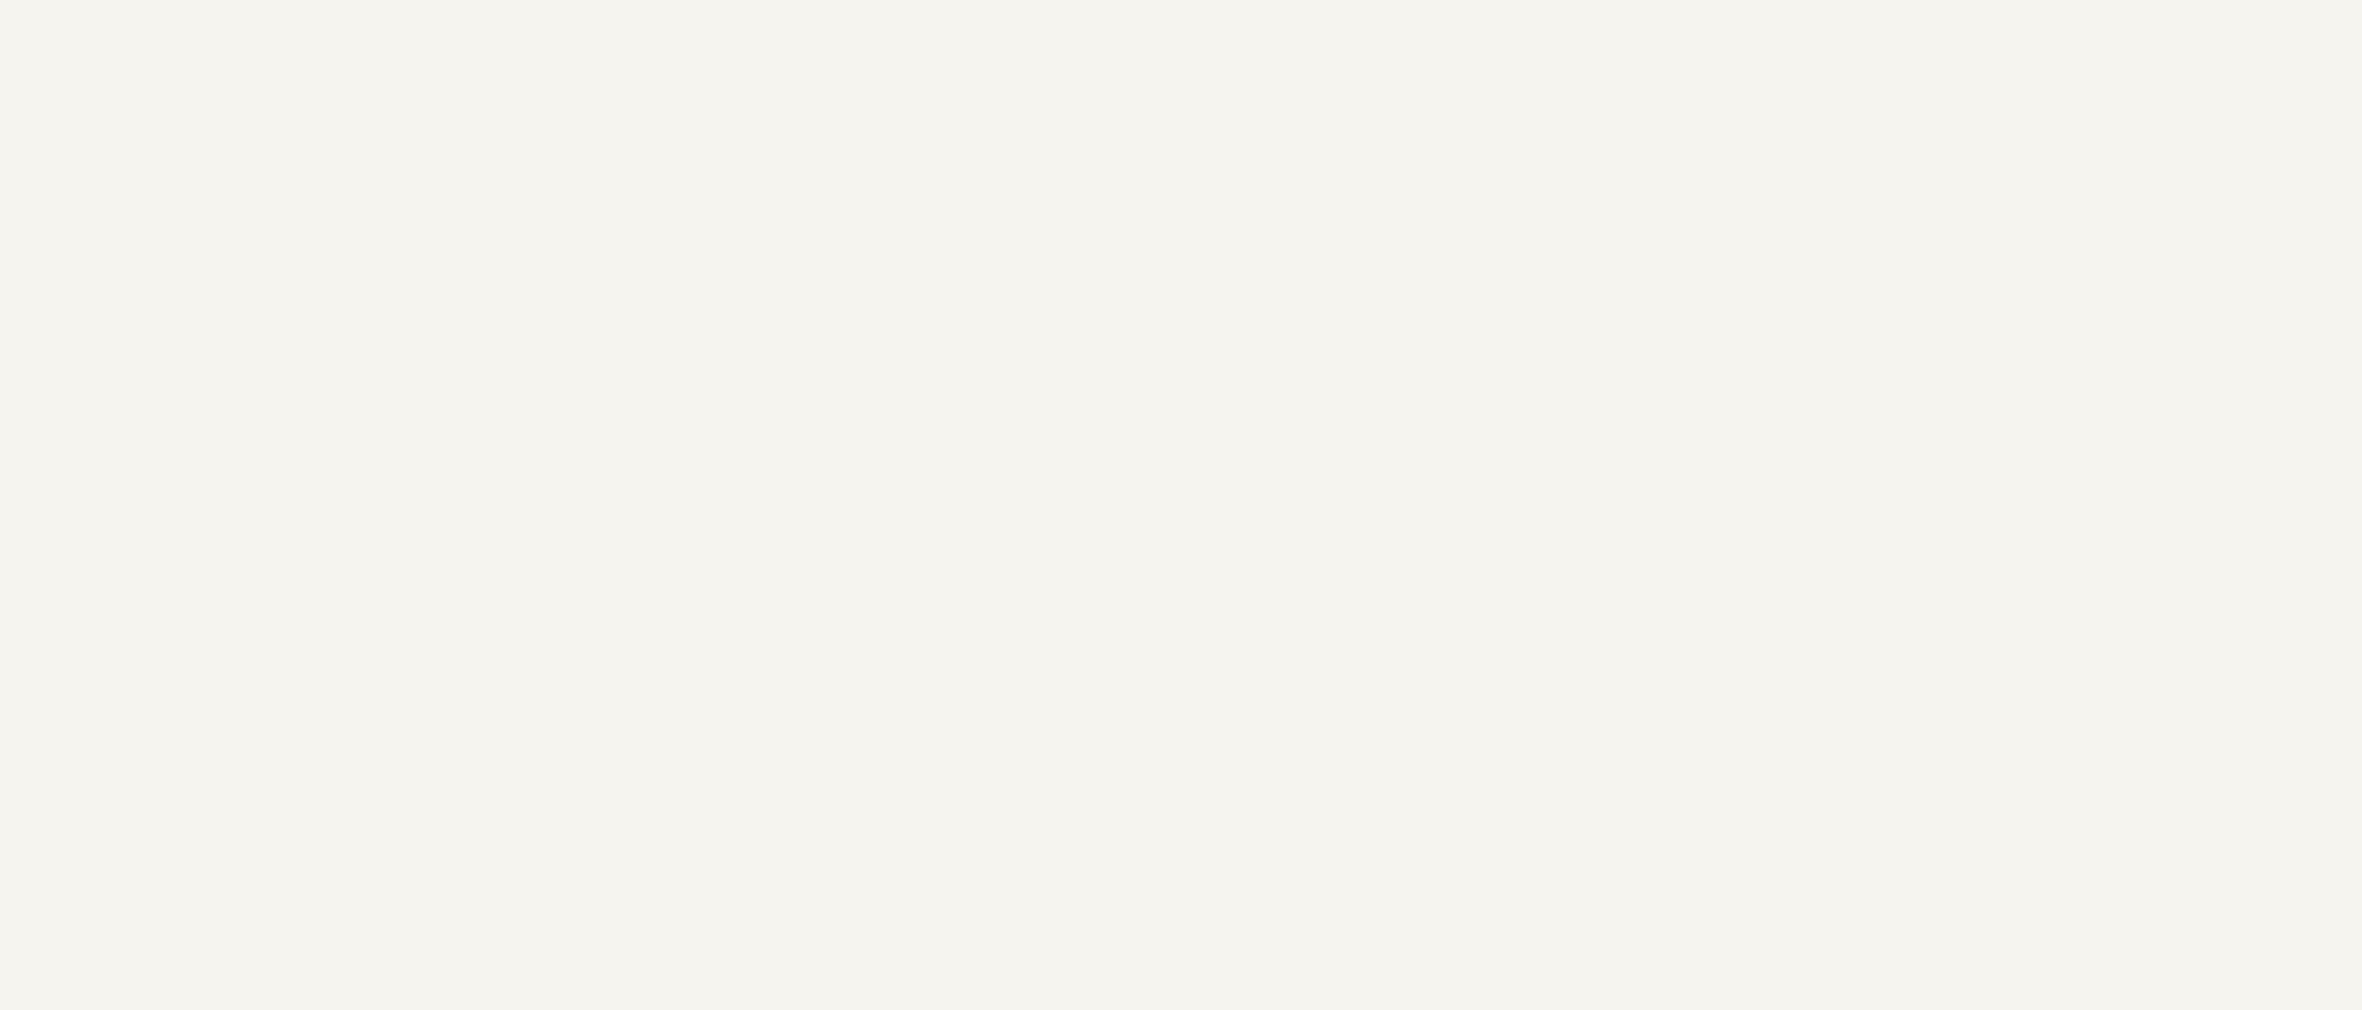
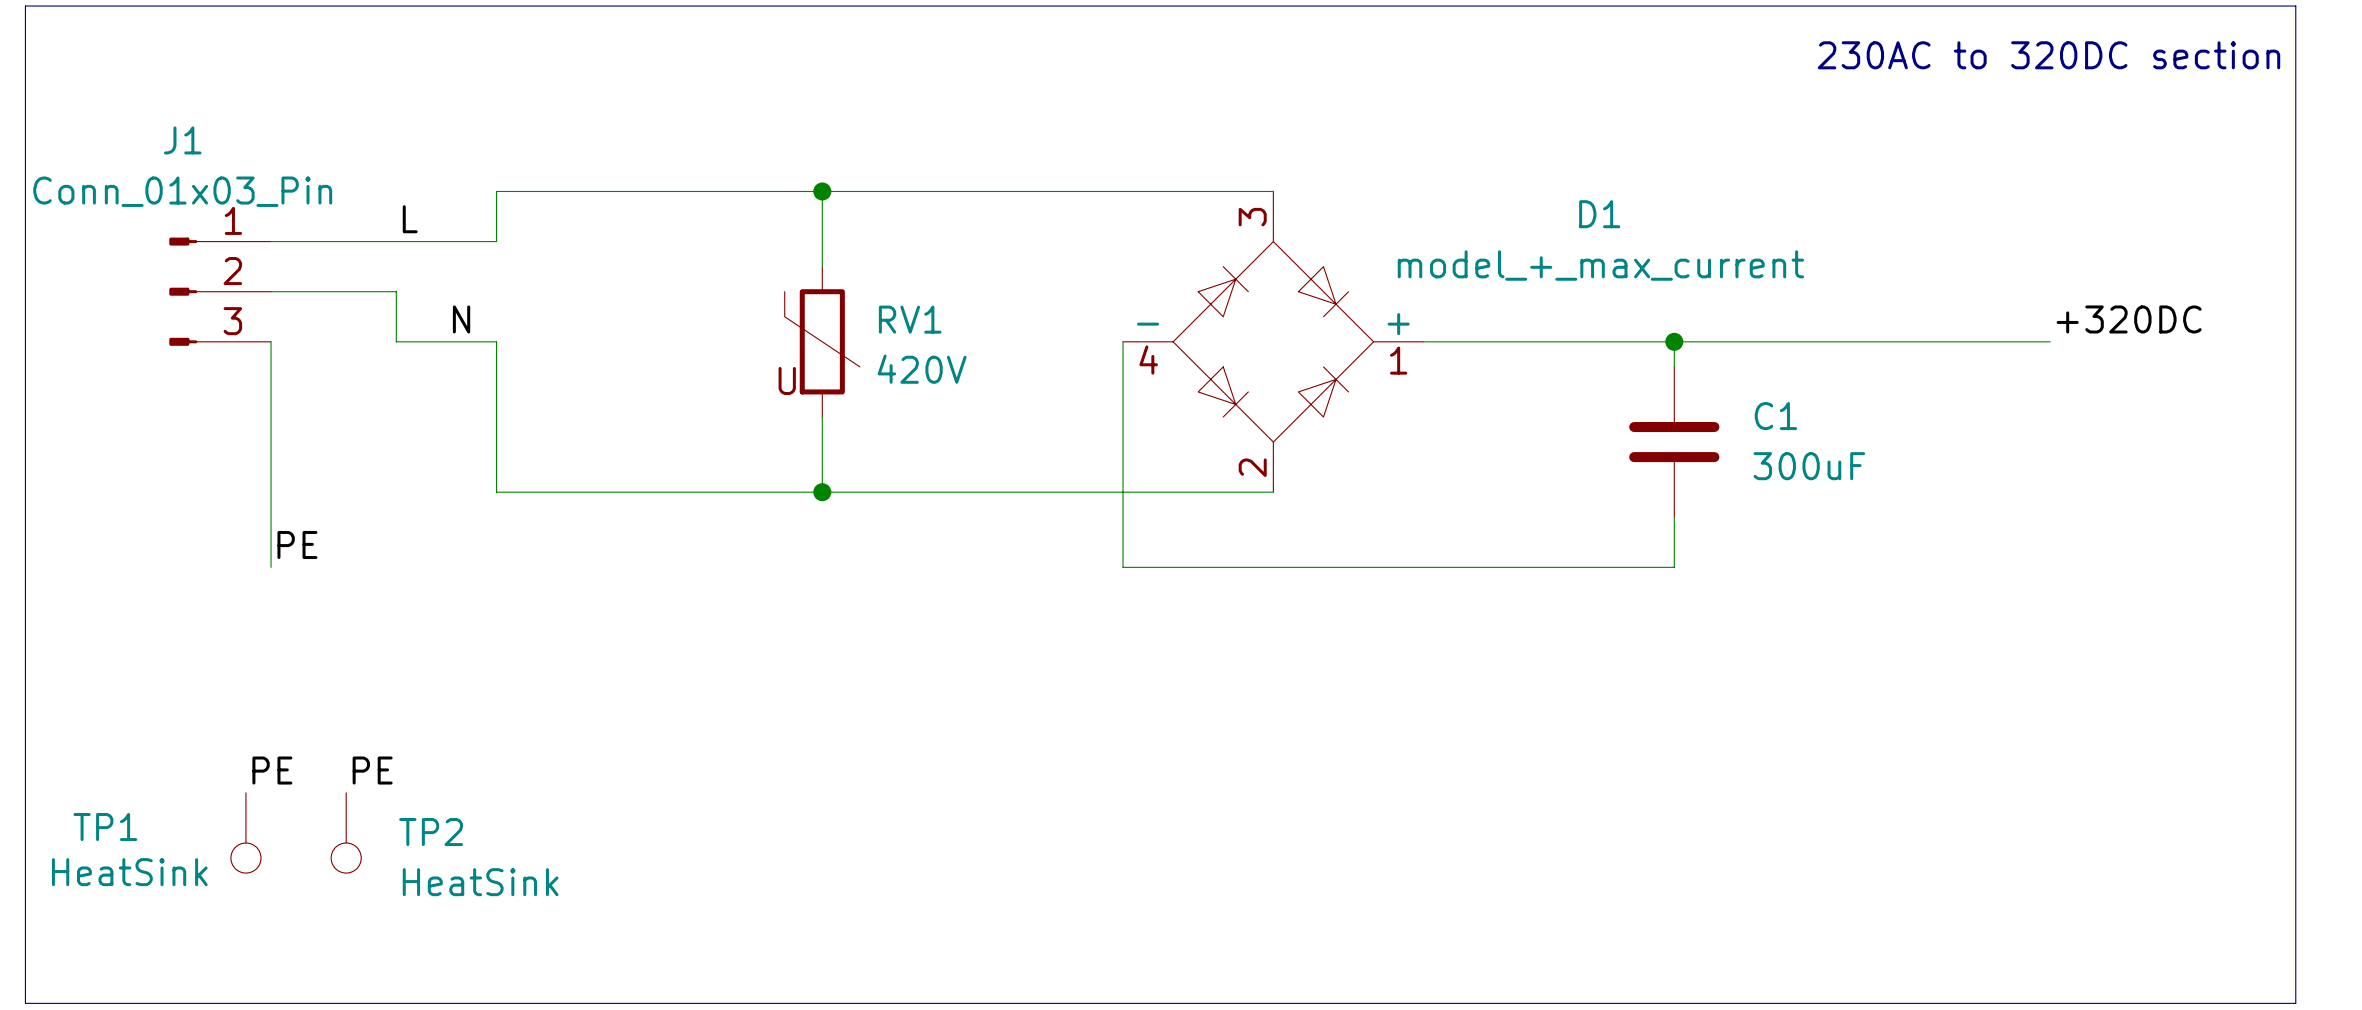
line: none -> (25, 6) (2295, 6) (2295, 1003) (25, 1003) (25, 6)
text: none -> 230AC to 320DC section (2048, 55)
wire: none -> (822, 191) (822, 266)
junction: none -> (822, 191)
wire: none -> (1273, 191) (496, 191) (496, 241) (271, 241)
label: none -> L (410, 219)
J1: none -> Conn_01x03_Pin (220, 291)
wire: none -> (271, 291) (396, 291) (396, 341) (496, 341) (496, 492) (1273, 492)
label: none -> N (461, 319)
label: none -> +320DC (2129, 319)
wire: none -> (271, 341) (271, 567)
RV1: none -> 420V (822, 341)
wire: none -> (1123, 341) (1123, 567) (1674, 567) (1674, 517)
D1: none -> model_+_max_current (1273, 341)
wire: none -> (1423, 341) (2050, 341)
wire: none -> (1674, 341) (1674, 366)
junction: none -> (1674, 341)
wire: none -> (822, 417) (822, 492)
C1: none -> 300uF (1674, 442)
junction: none -> (822, 492)
label: none -> PE (297, 544)
label: none -> PE (272, 770)
label: none -> PE (372, 770)
TP1: none -> HeatSink (245, 832)
TP2: none -> HeatSink (346, 832)

